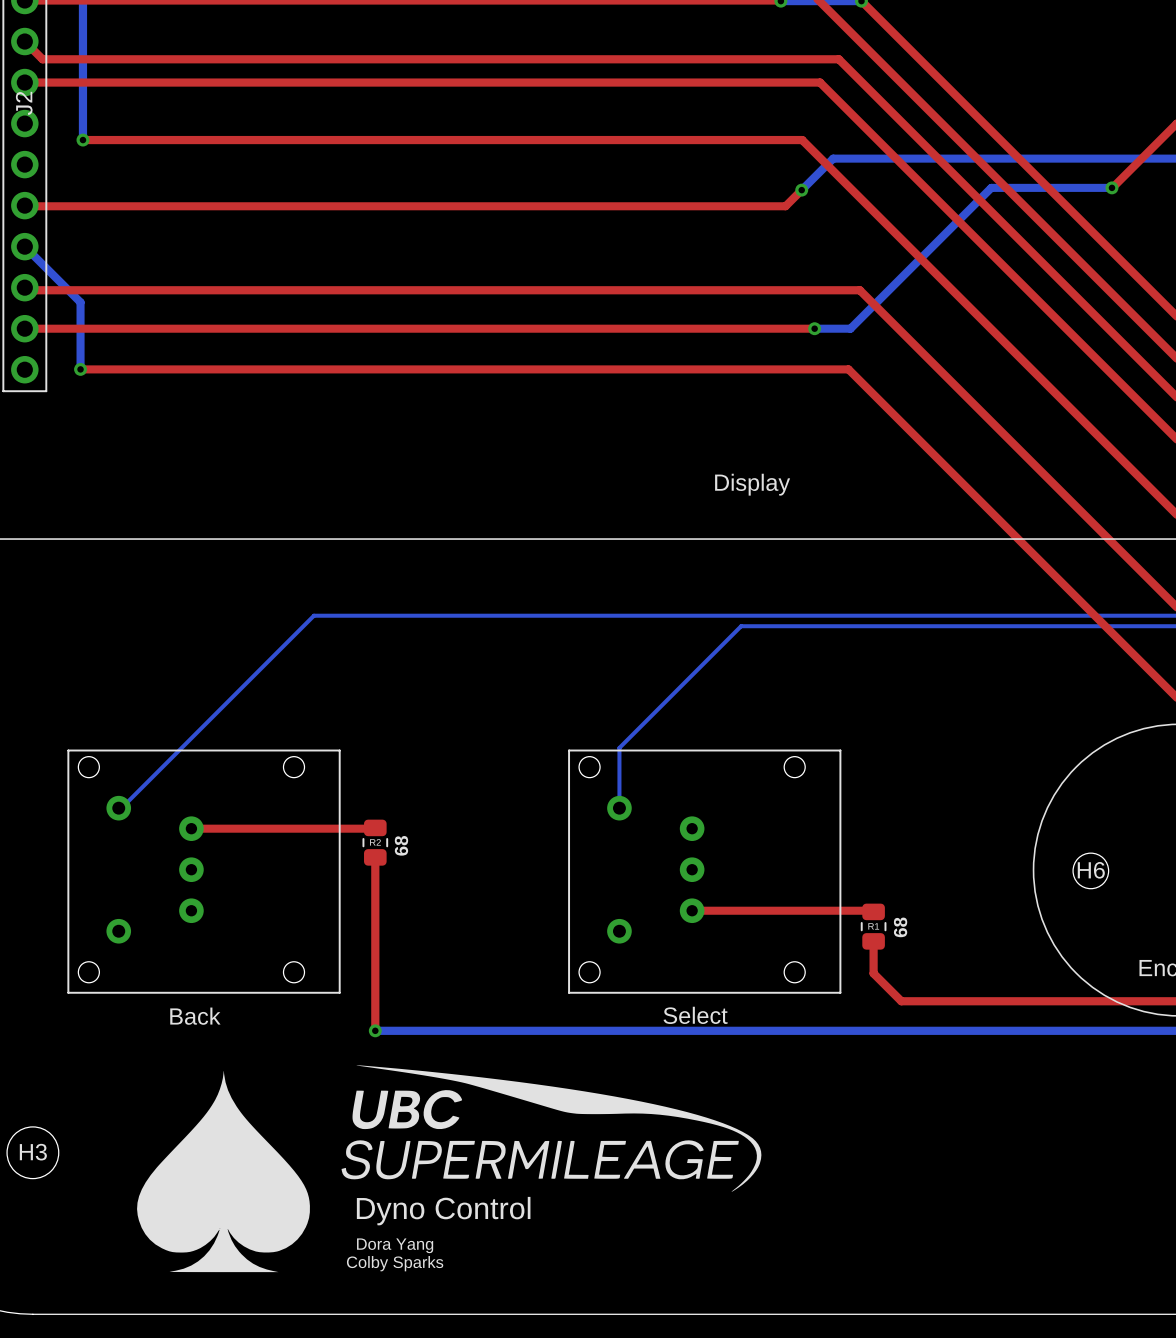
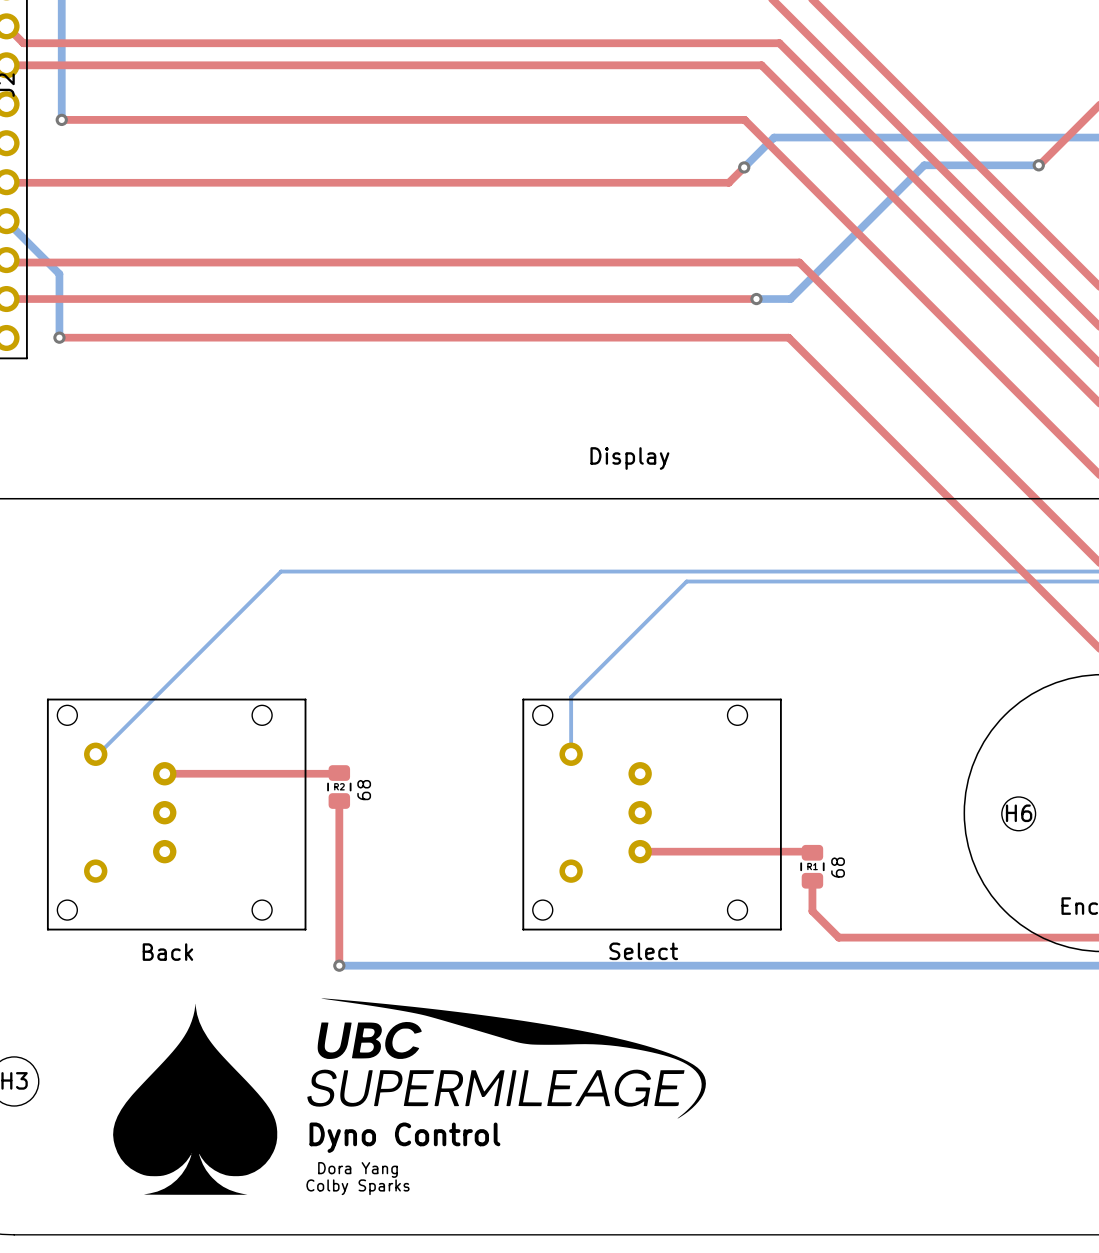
J2 value position: Display (752, 484) -> Display (629, 458)

